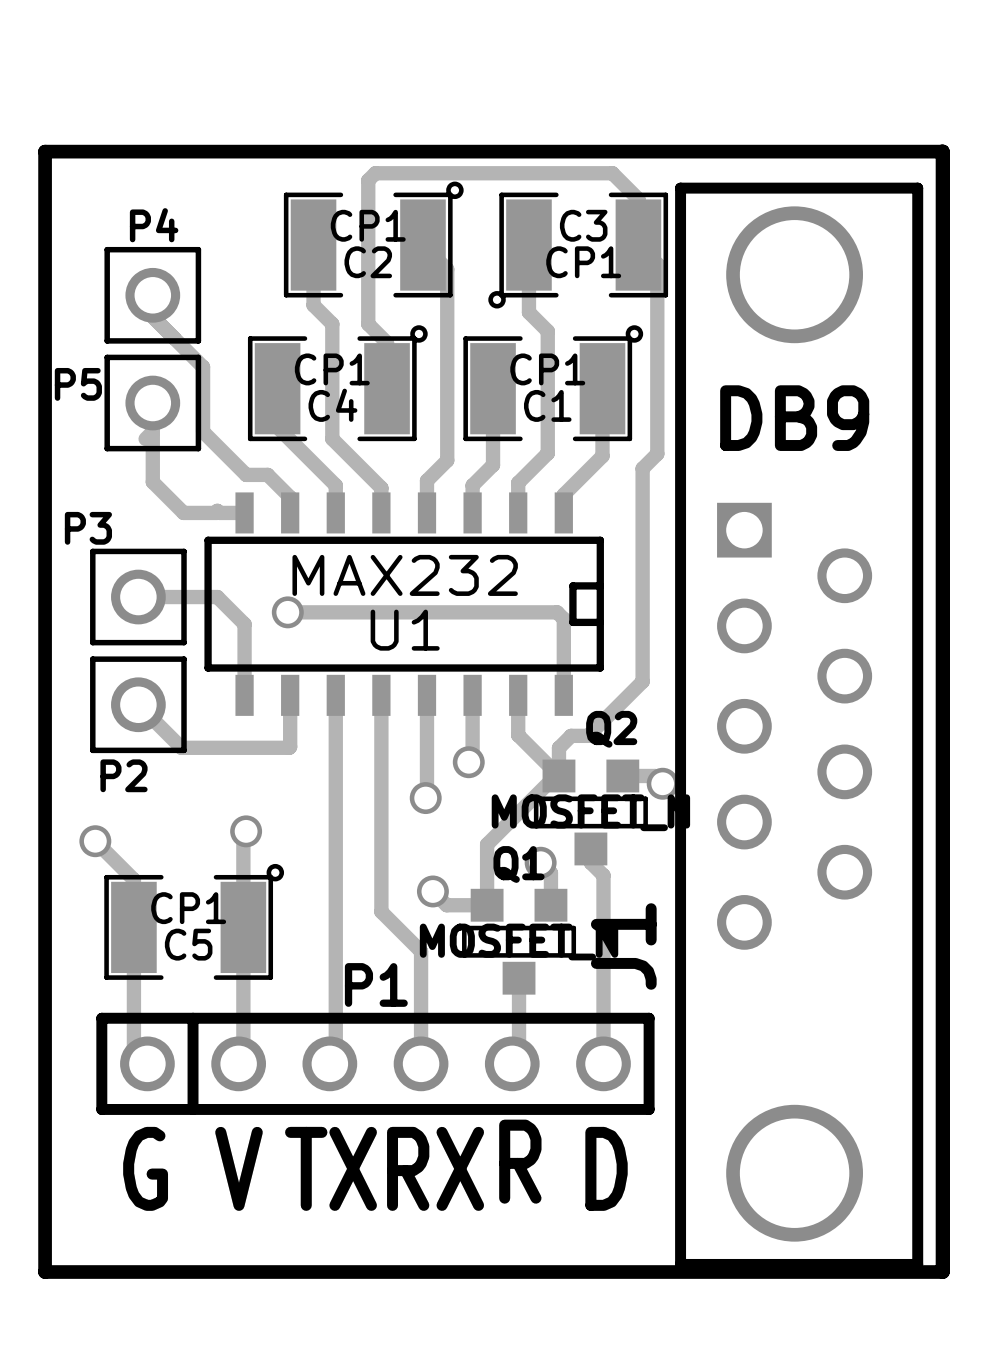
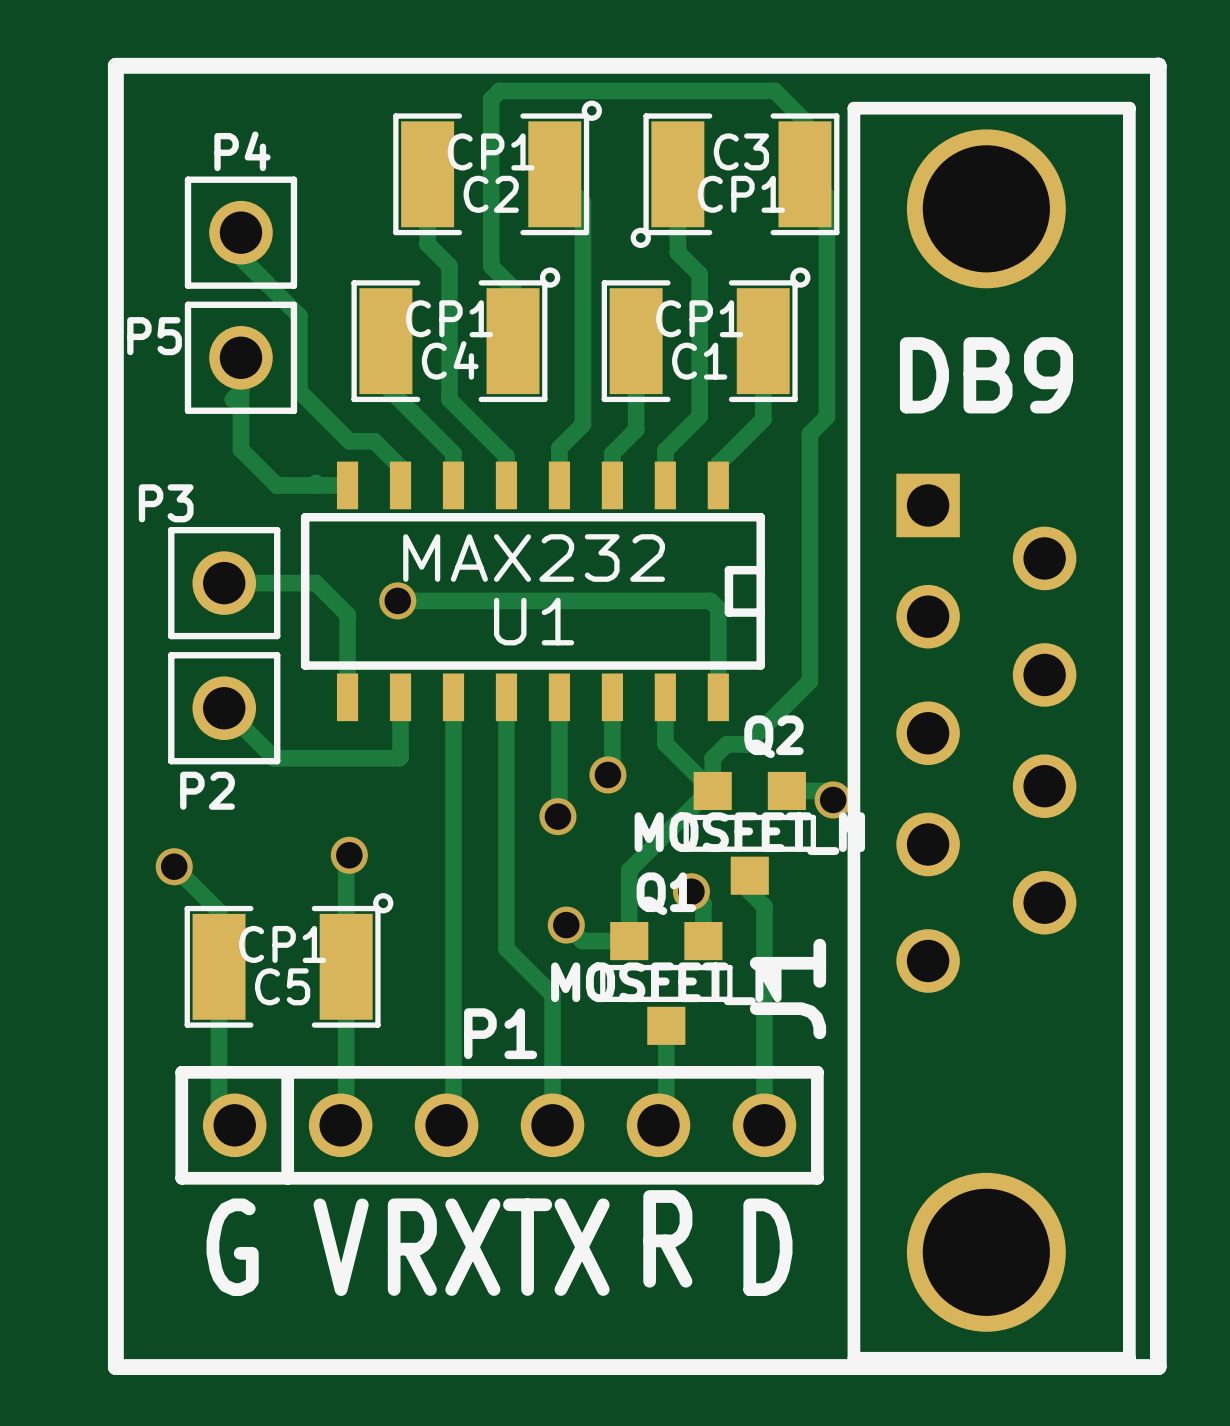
text: none -> RX (444, 1247)
text: TX (331, 1168) -> none
text: none -> TX (556, 1247)
text: RX (435, 1168) -> none

